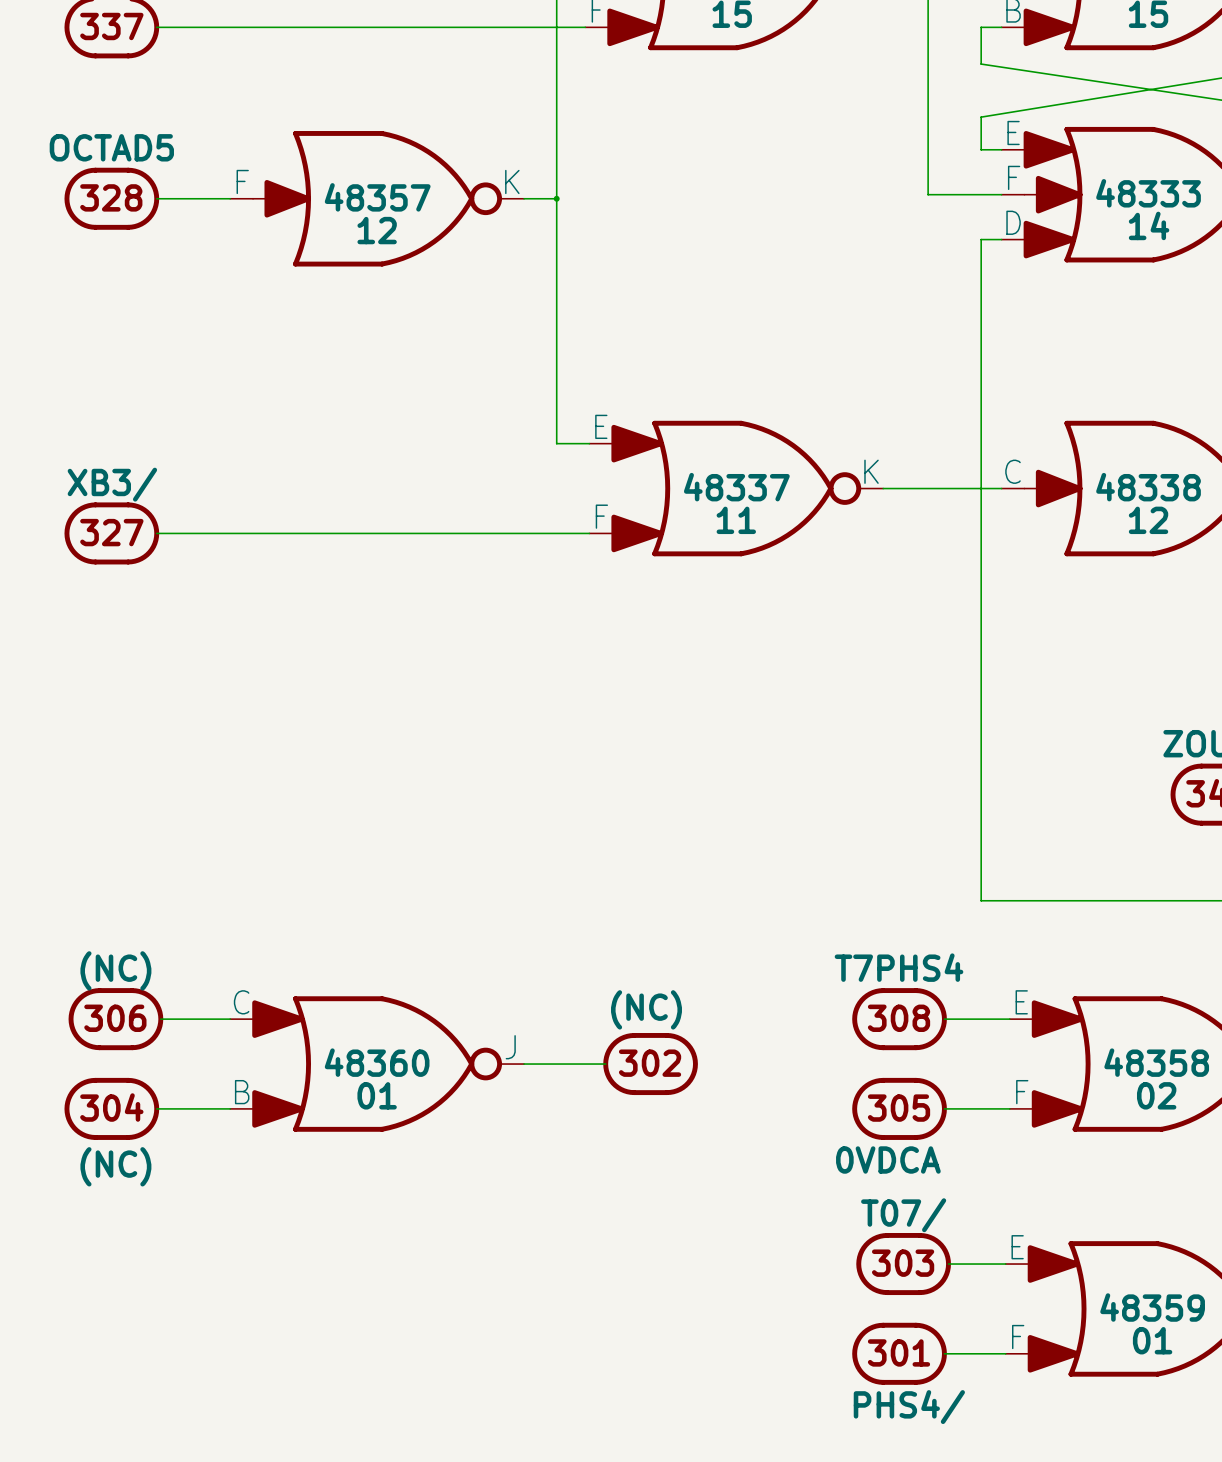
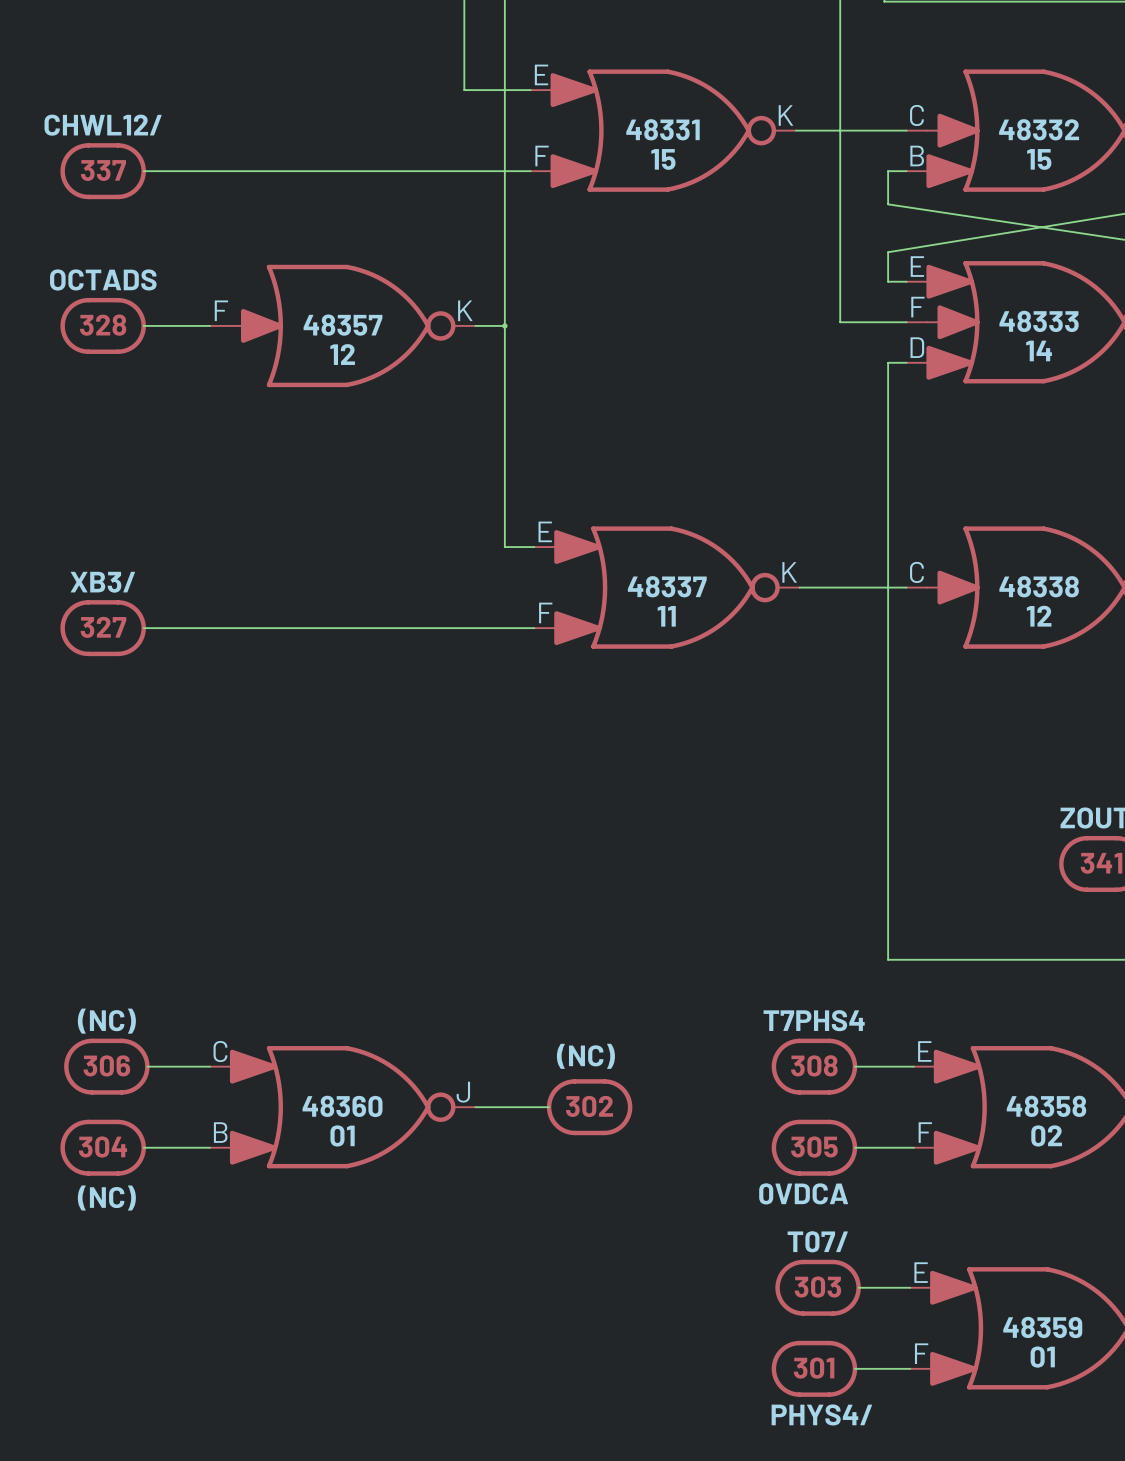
part text: OCTAD5 (111, 147) -> OCTADS (103, 279)
part text: PHS4/ (909, 1407) -> PHYS4/ (821, 1414)

